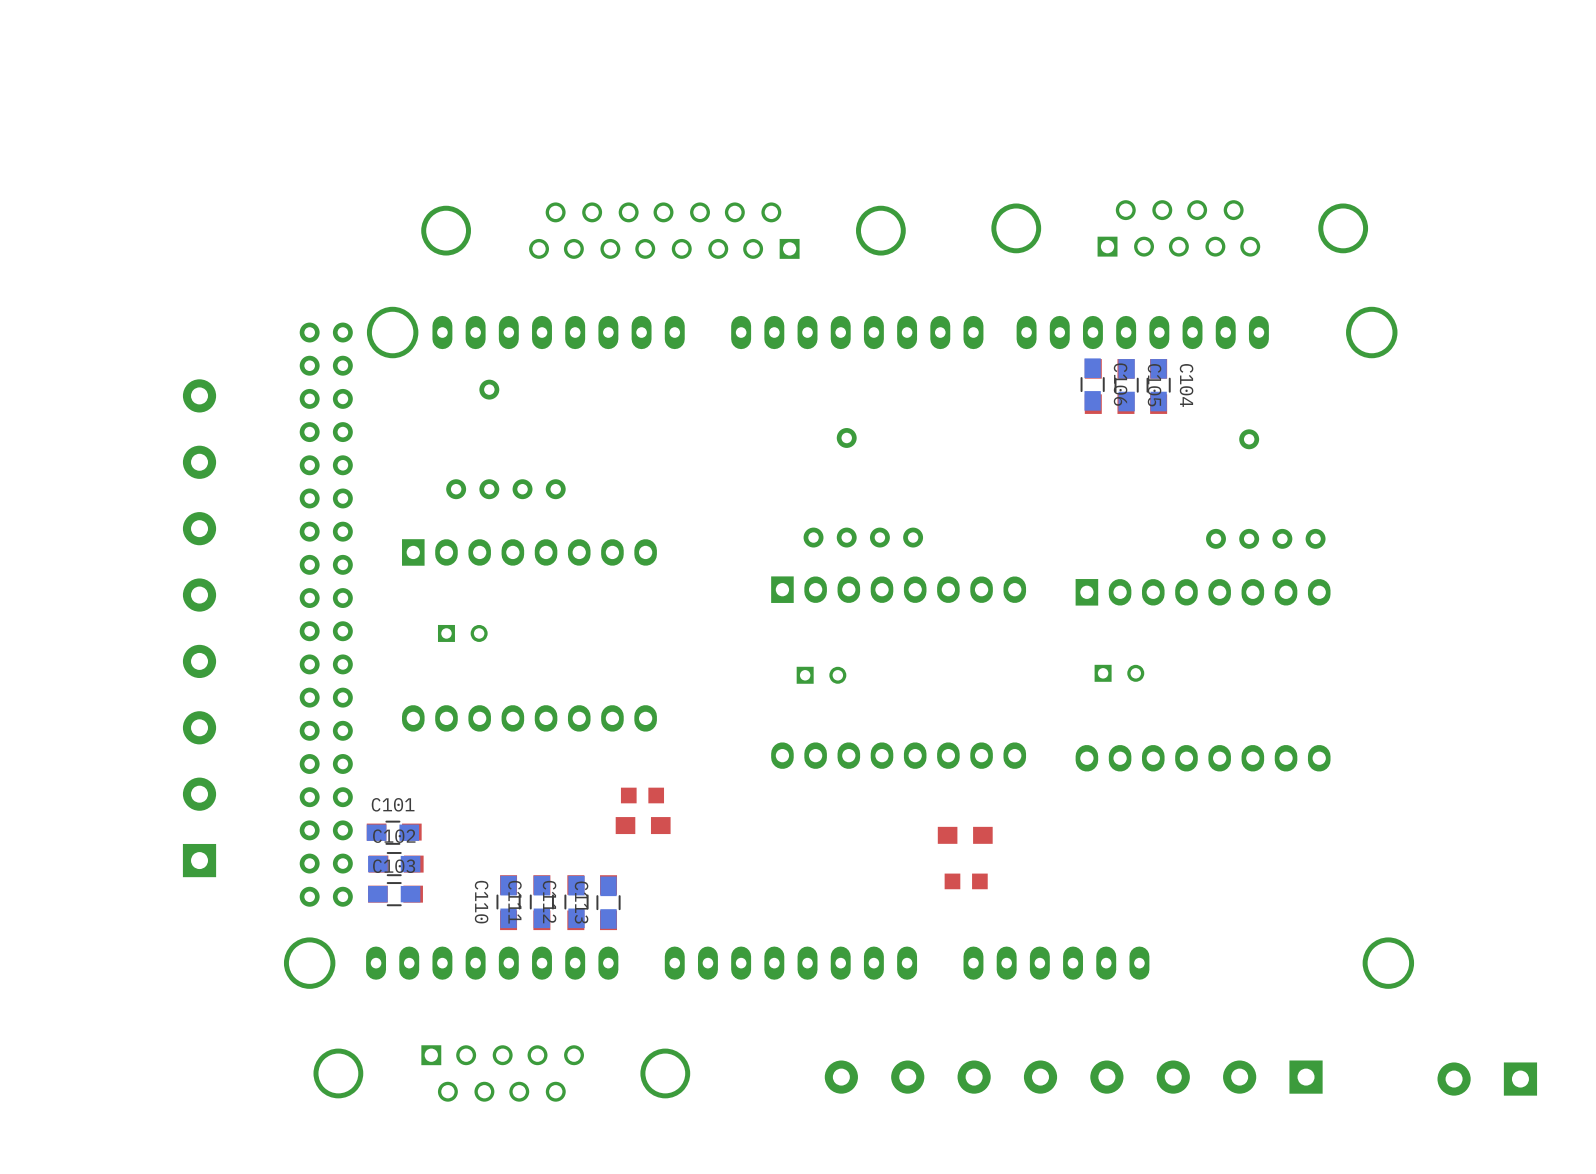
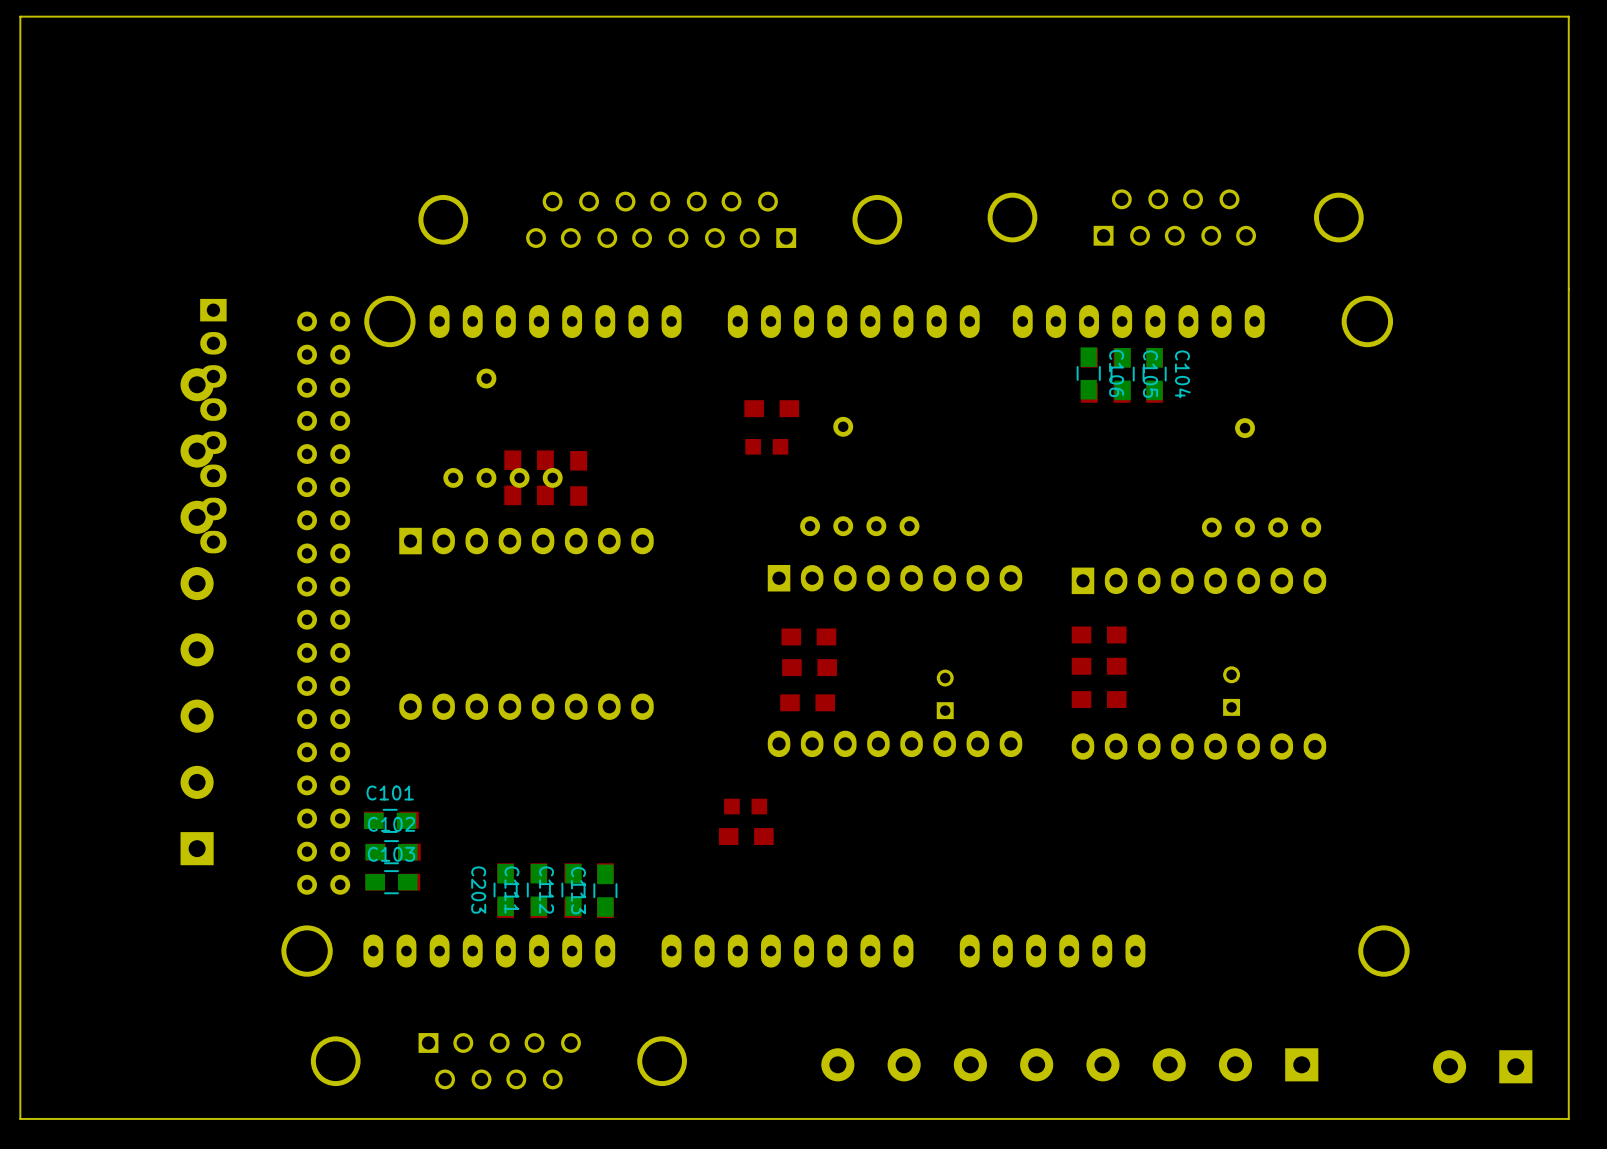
board edge: none -> (1568, 16) (1568, 1118) (20, 1118) (20, 16) (1568, 16)
part: none -> (771, 408)
part: none -> (213, 426)
part: none -> (766, 446)
part: none -> (512, 477)
part: none -> (545, 477)
part: none -> (578, 478)
part: (462, 633) -> none
part: none -> (1099, 634)
part: none -> (808, 636)
part footprint: [796, 666, 847, 684] -> [782, 659, 837, 677]
part: (1119, 673) -> none
part: none -> (1099, 666)
part: none -> (1231, 691)
part: none -> (945, 694)
part: none -> (1099, 699)
part: none -> (807, 702)
part position: (642, 795) -> (745, 806)
part: (643, 825) -> none
part: (965, 835) -> none
part: none -> (746, 836)
part: (966, 881) -> none
C110 name: C110 (481, 902) -> C203 (478, 890)

